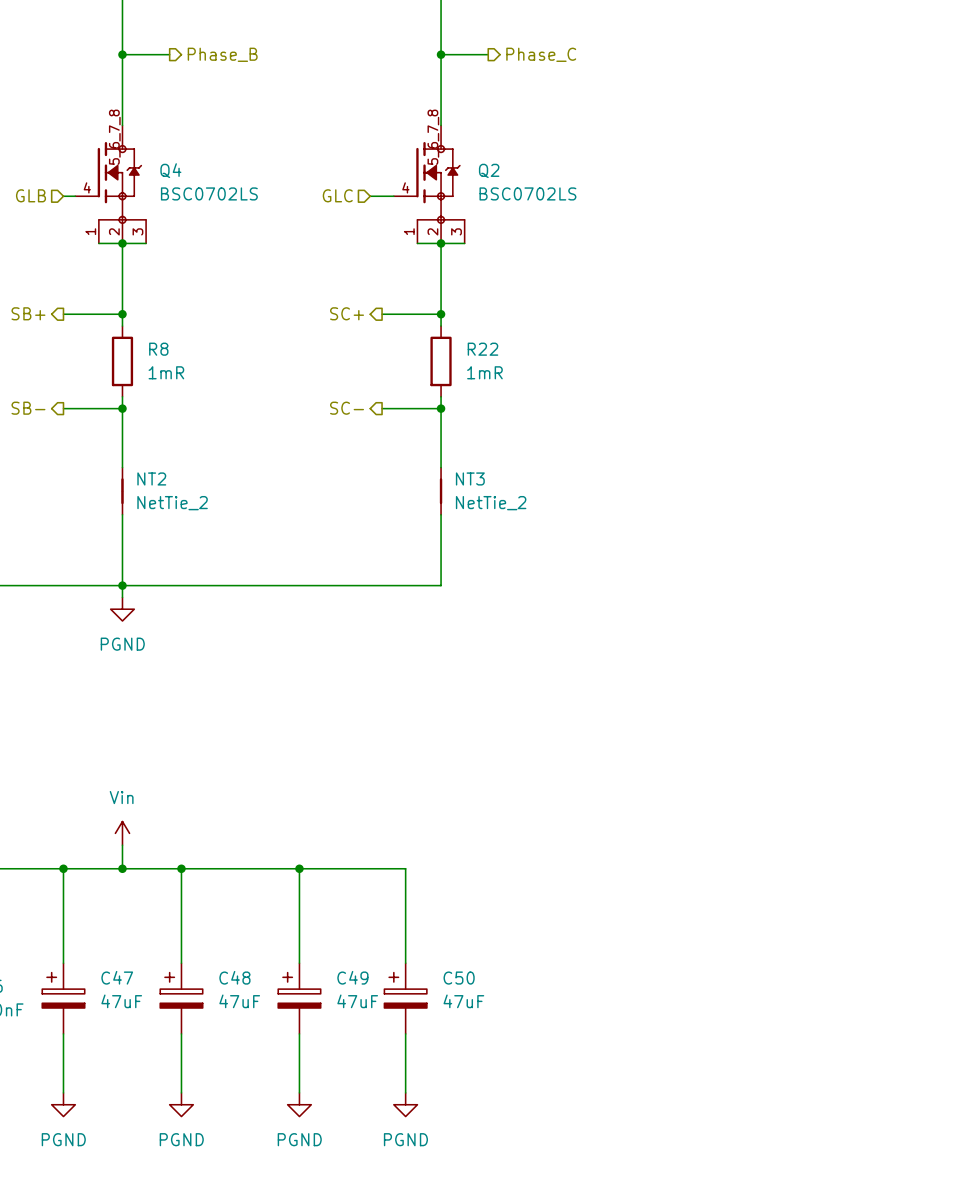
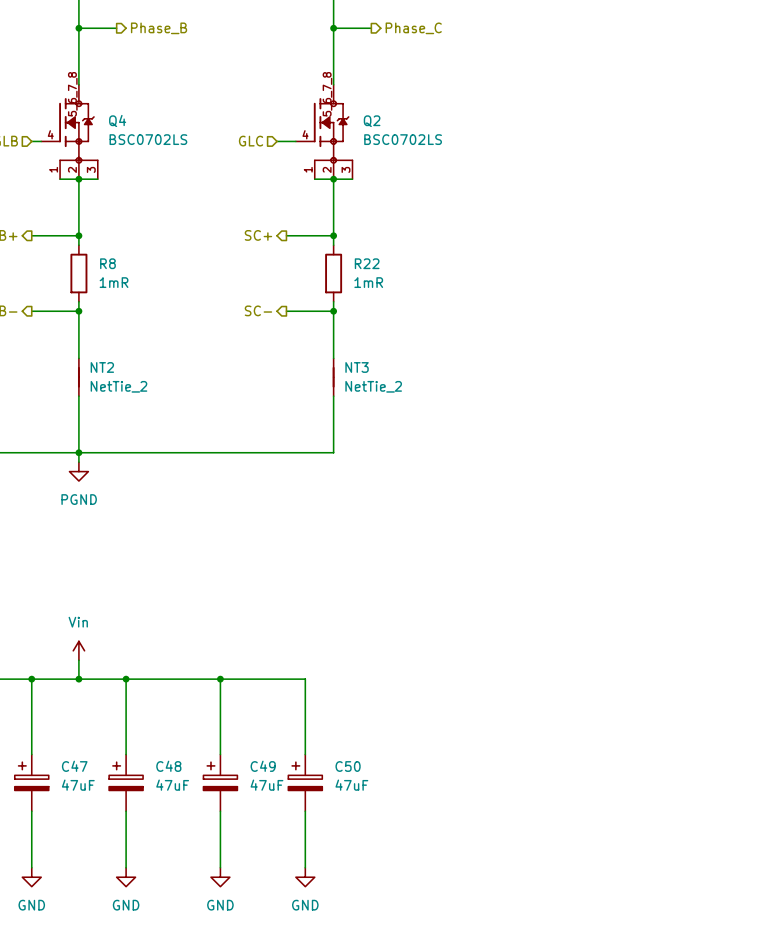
power symbol: PGND (63, 1104) -> none
power symbol: PGND (181, 1104) -> none
power symbol: PGND (299, 1104) -> none
power symbol: PGND (405, 1104) -> none
power symbol: none -> GND (31, 877)
power symbol: none -> GND (126, 877)
power symbol: none -> GND (220, 877)
power symbol: none -> GND (305, 877)

